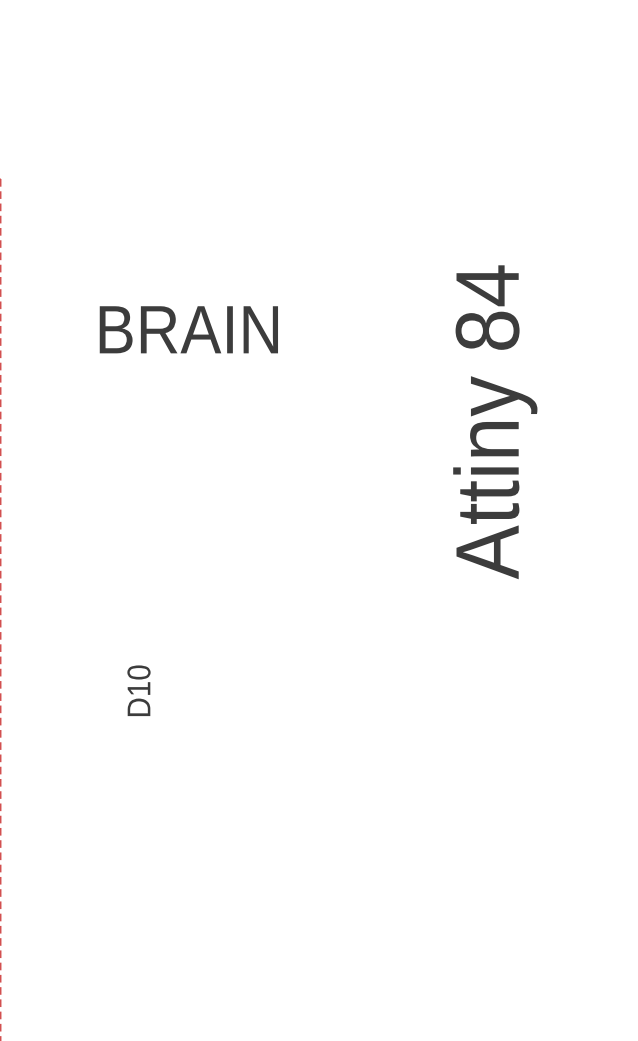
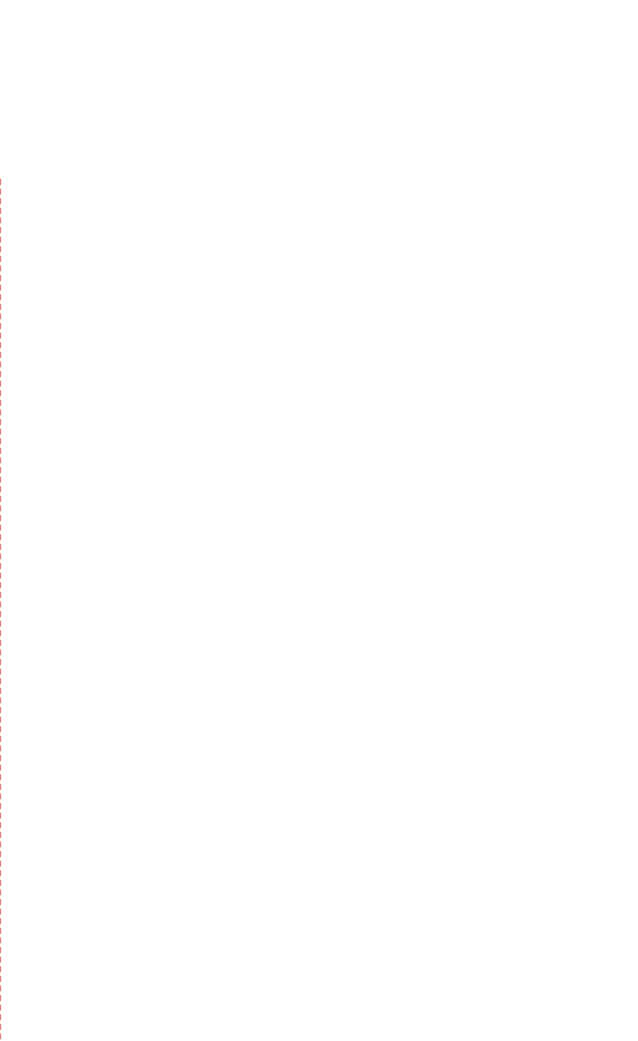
text: BRAIN (188, 329) -> none
text: Attiny 84 (495, 422) -> none
text: D10 (138, 690) -> none

